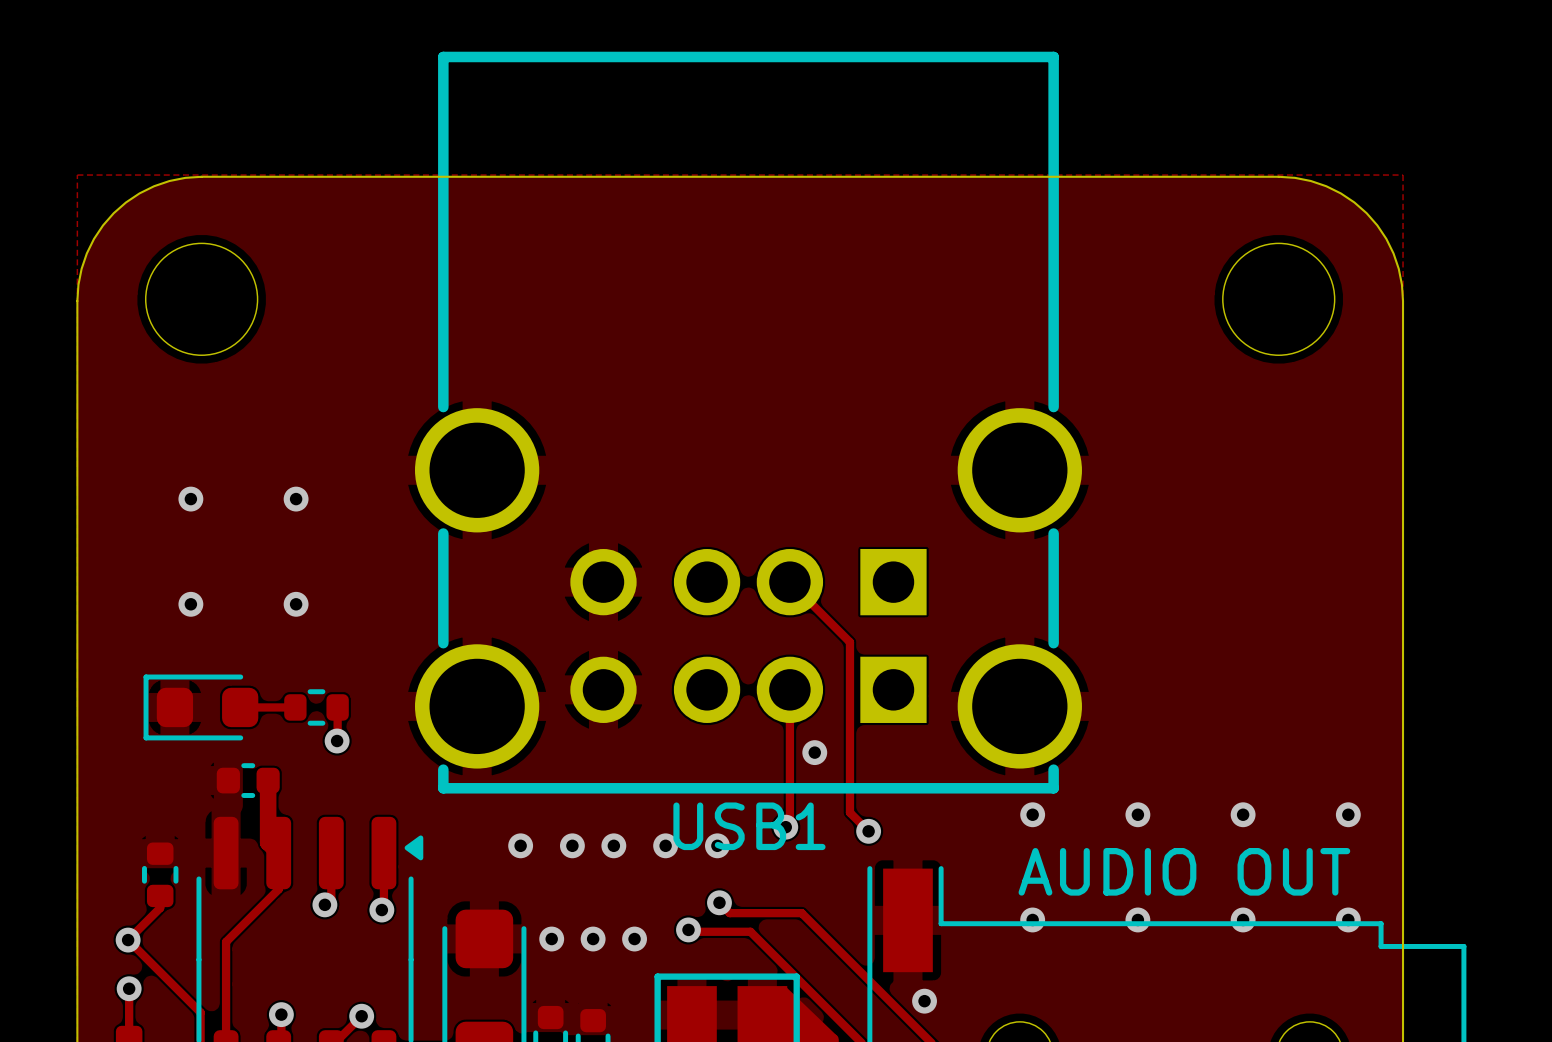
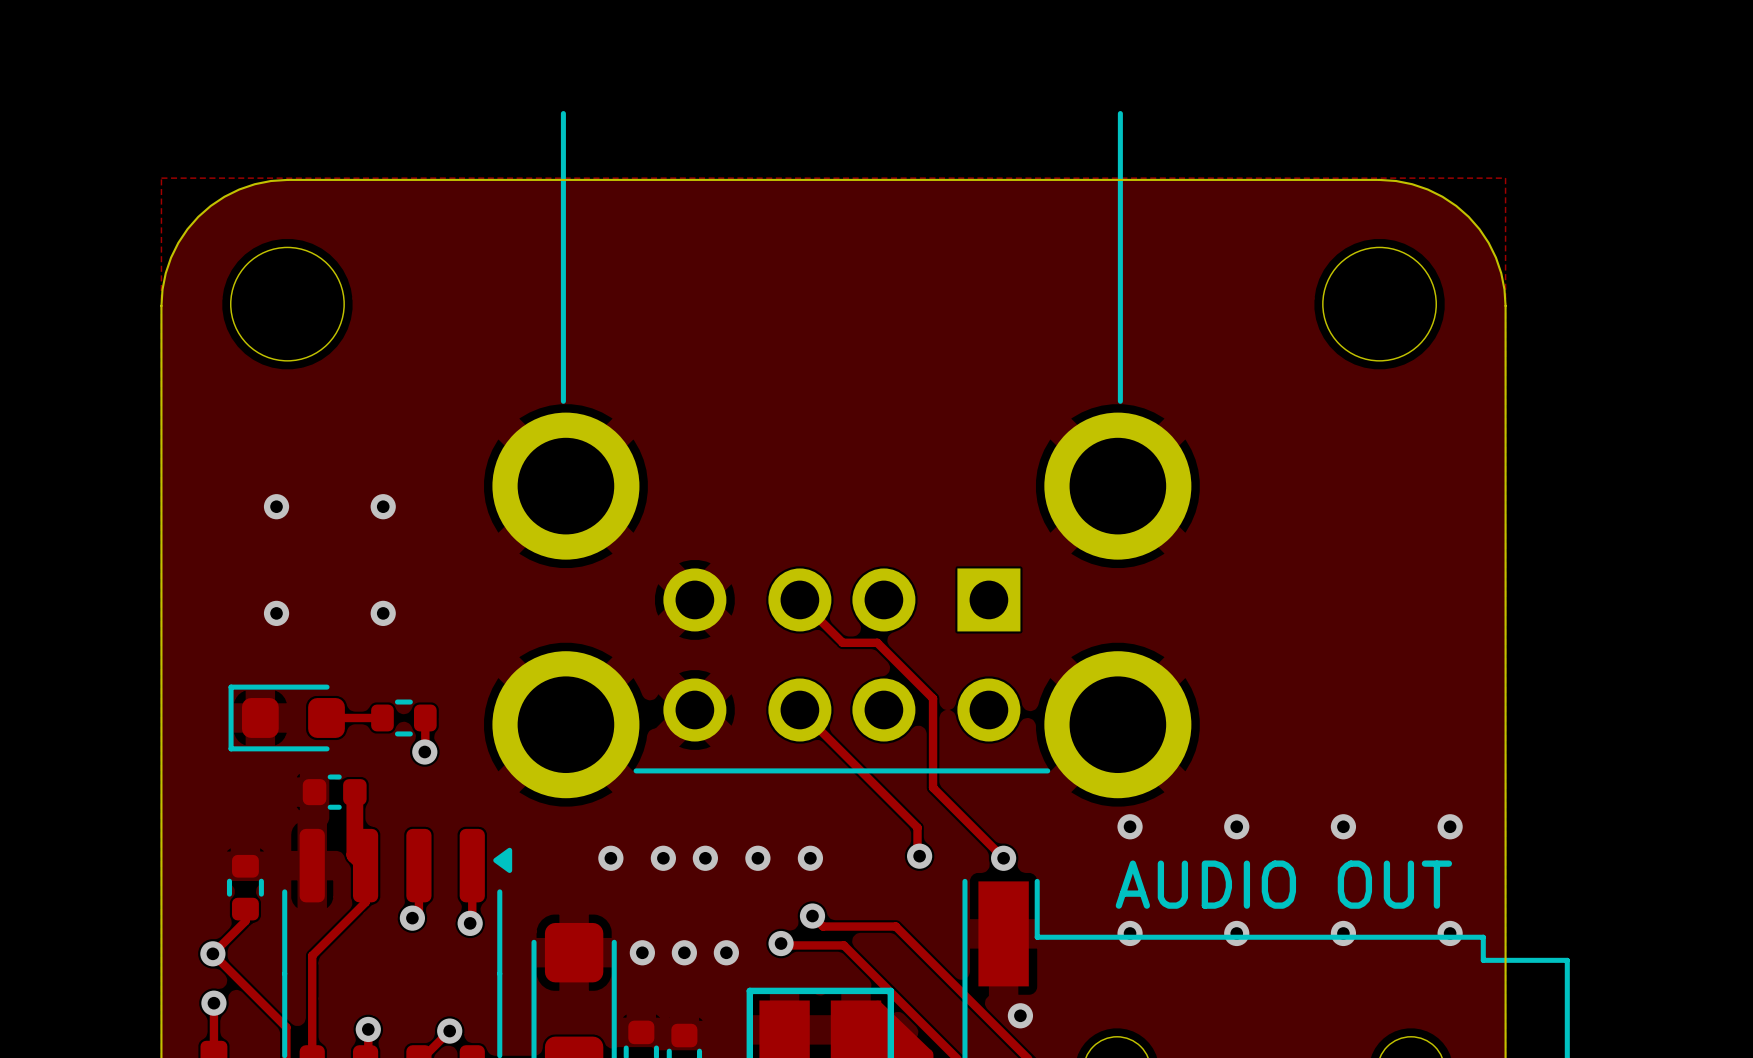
USB1: (748, 422) -> none
part: none -> (841, 454)
track: (789, 582) (849, 642) (849, 812) (868, 831) -> none
track: none -> (799, 599) (842, 642) (877, 642) (933, 698) (933, 787) (1003, 858)
track: (789, 689) (789, 823) (785, 827) -> none
track: none -> (799, 710) (917, 827) (917, 854) (919, 856)
via: (814, 752) -> none
via: (785, 827) -> none
via: (868, 831) -> none
via: none -> (919, 856)
via: none -> (1003, 858)

